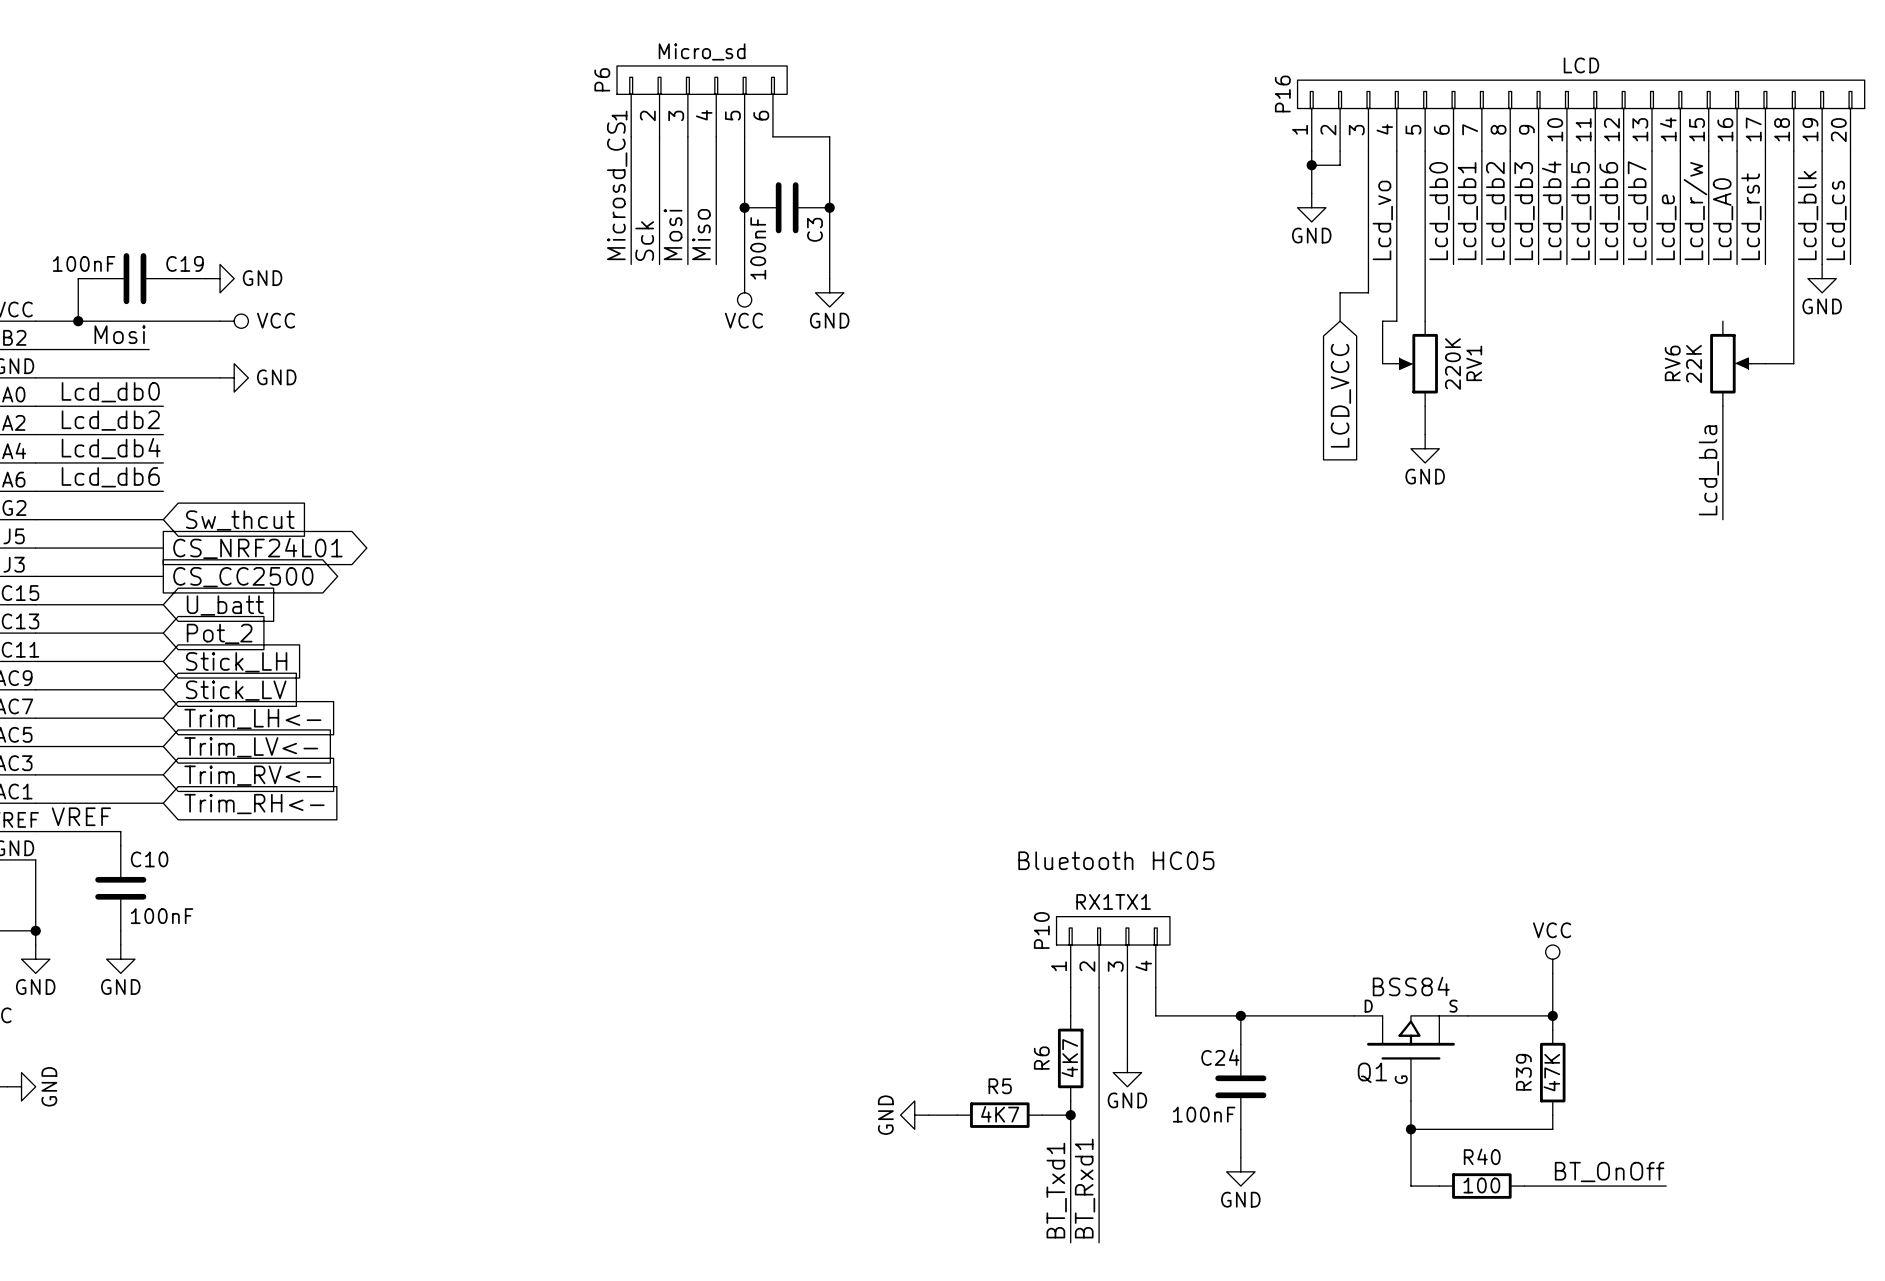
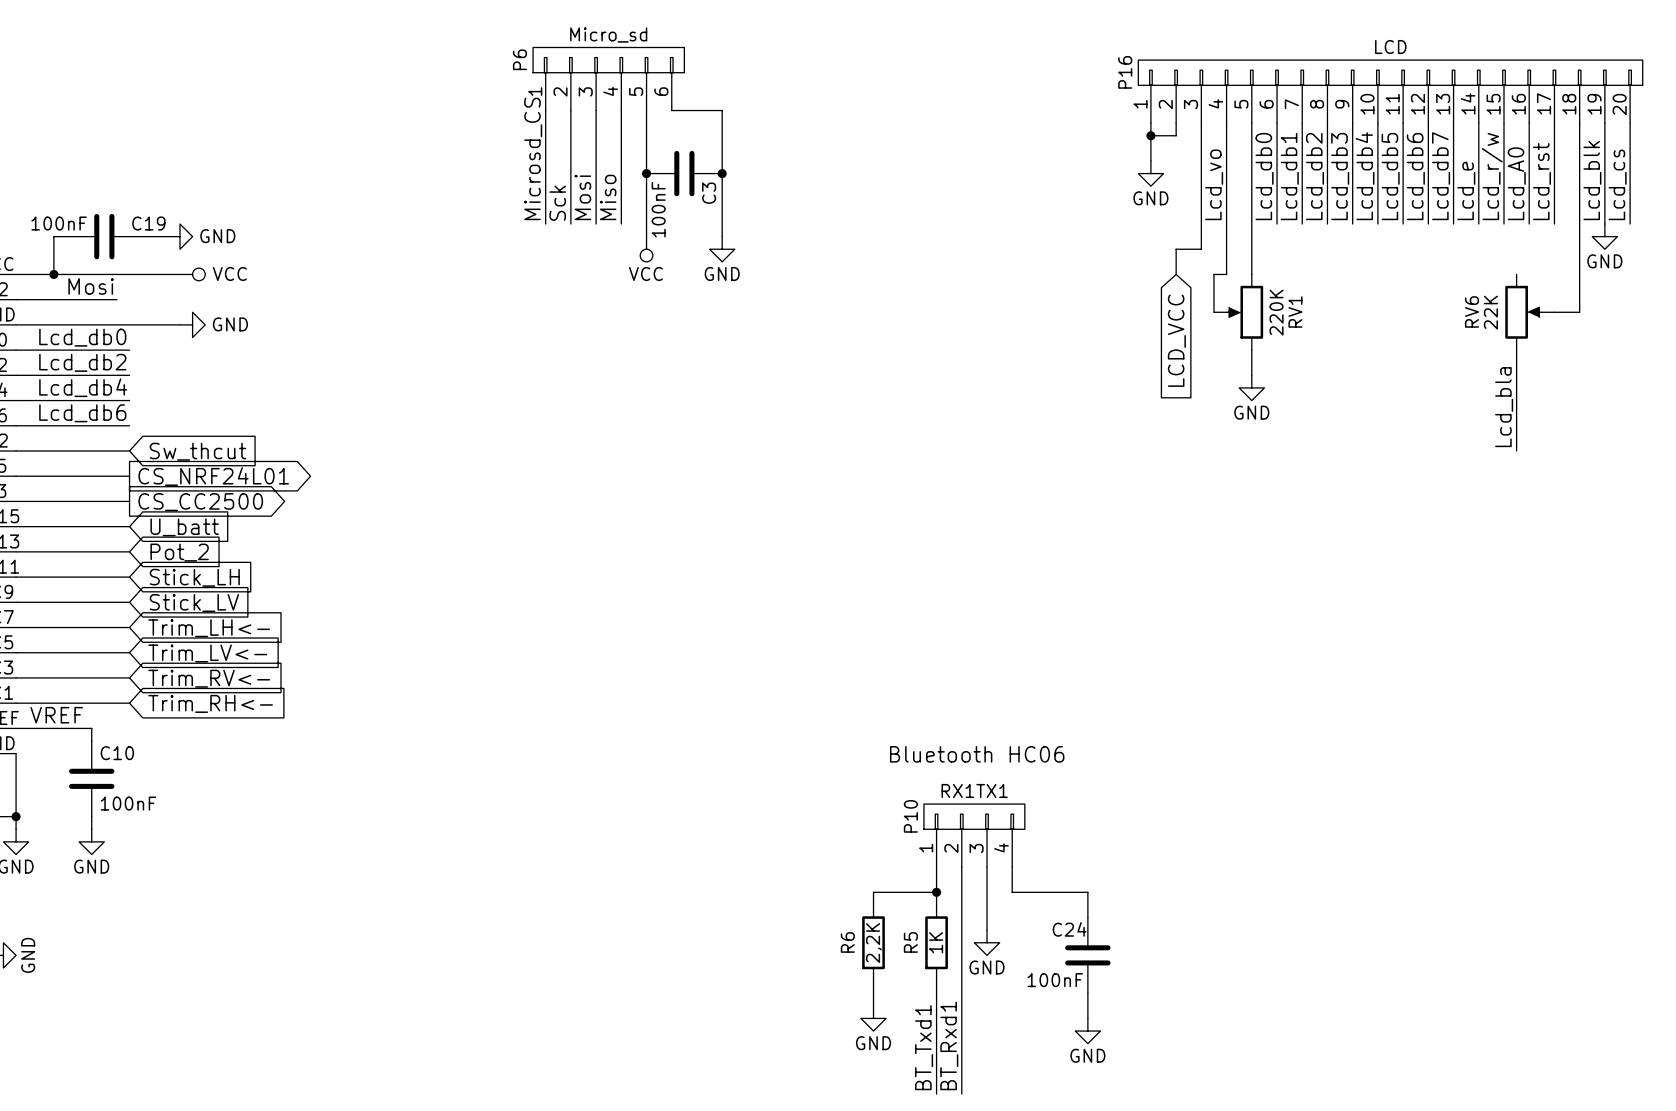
text: Bluetooth HC05 (1116, 860) -> Bluetooth HC06 (977, 754)
power symbol: VCC (1552, 959) -> none
wire: (1552, 973) (1552, 1030) -> none
junction: none -> (936, 892)
wire: (1240, 1015) (1354, 1015) -> none
junction: (1240, 1015) -> none
wire: (1467, 1015) (1552, 1015) -> none
junction: (1552, 1015) -> none
wire: none -> (873, 904) (873, 892) (936, 892) (936, 904)
R6 value: 4K7 (1069, 1058) -> 2,2K (873, 943)
R6 position: (1070, 1058) -> (873, 942)
Q1: BSS84 (1410, 1058) -> none
R39: 47K (1552, 1072) -> none
R5 name position: R5 (1000, 1086) -> R5 (910, 942)
wire: (1070, 1100) (1070, 1115) (1042, 1115) -> none
wire: (1410, 1100) (1410, 1186) (1439, 1186) -> none
R5 value: 4K7 (1000, 1114) -> 1K (936, 942)
power symbol rotation: 0° (914, 1115) -> 90° counterclockwise (873, 1018)
power symbol position: GND (914, 1115) -> GND (873, 1018)
wire: (928, 1115) (957, 1115) -> none
wire: none -> (873, 980) (873, 1005)
R5 rotation: 0° (999, 1115) -> 90° clockwise (936, 942)
R5 position: (999, 1115) -> (936, 942)
junction: (1070, 1115) -> none
wire: (1552, 1115) (1552, 1129) (1410, 1129) -> none
junction: (1410, 1129) -> none
label: BT_OnOff (1609, 1172) -> none
R40: 100 (1481, 1186) -> none
wire: (1524, 1186) (1666, 1186) -> none

